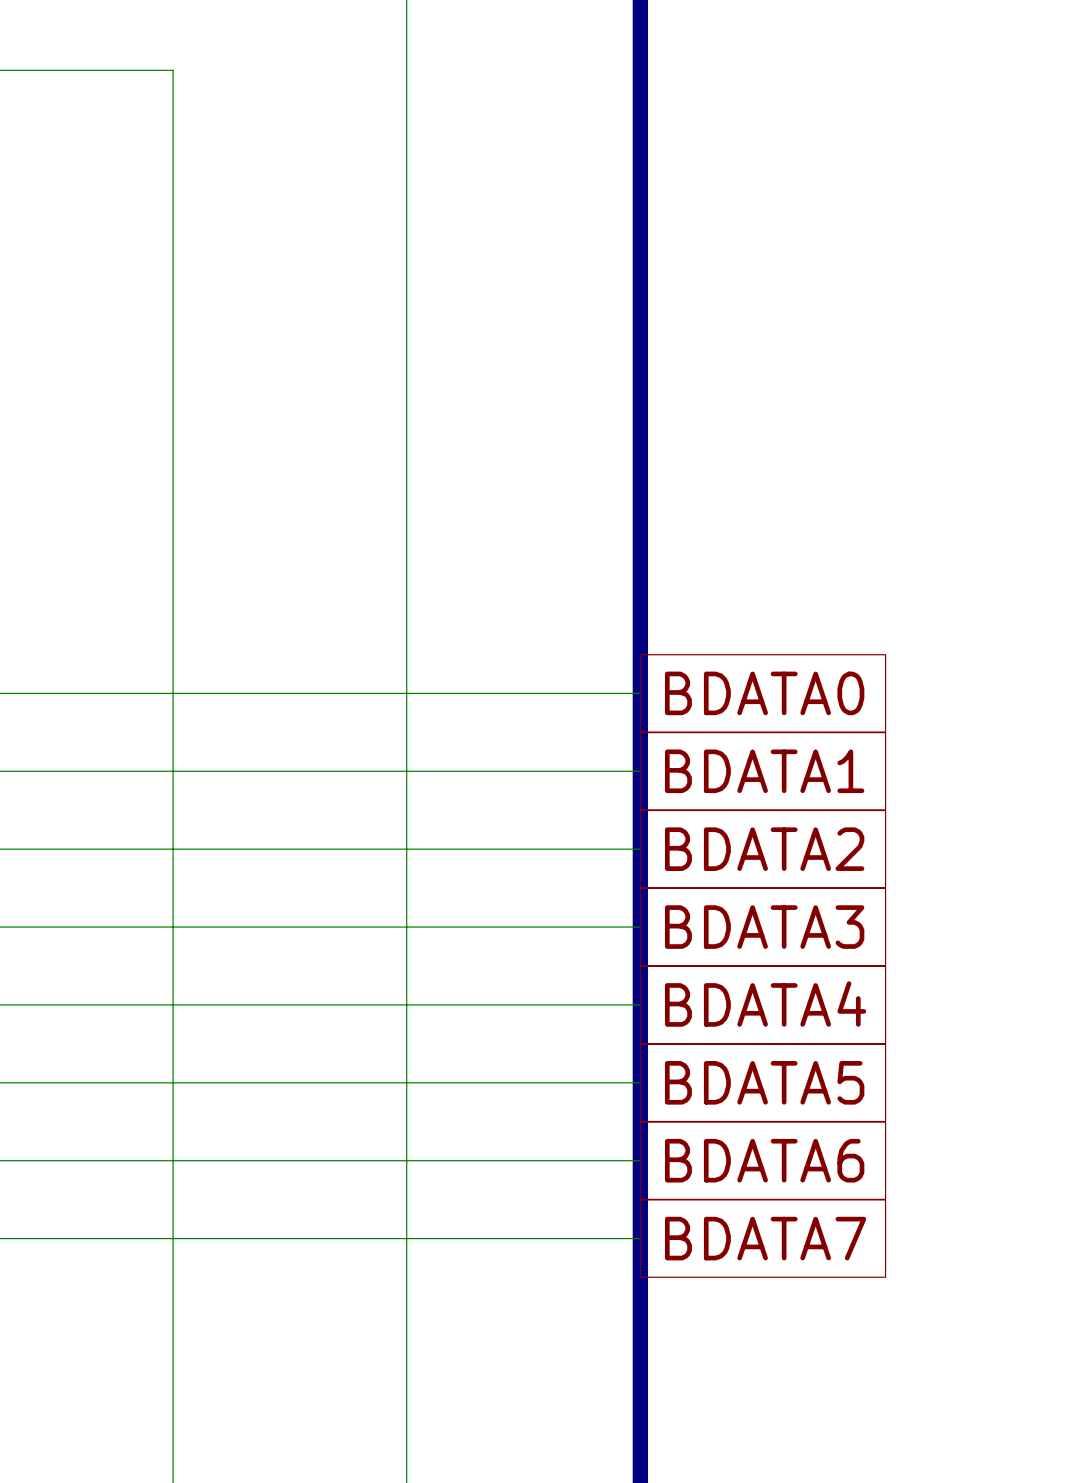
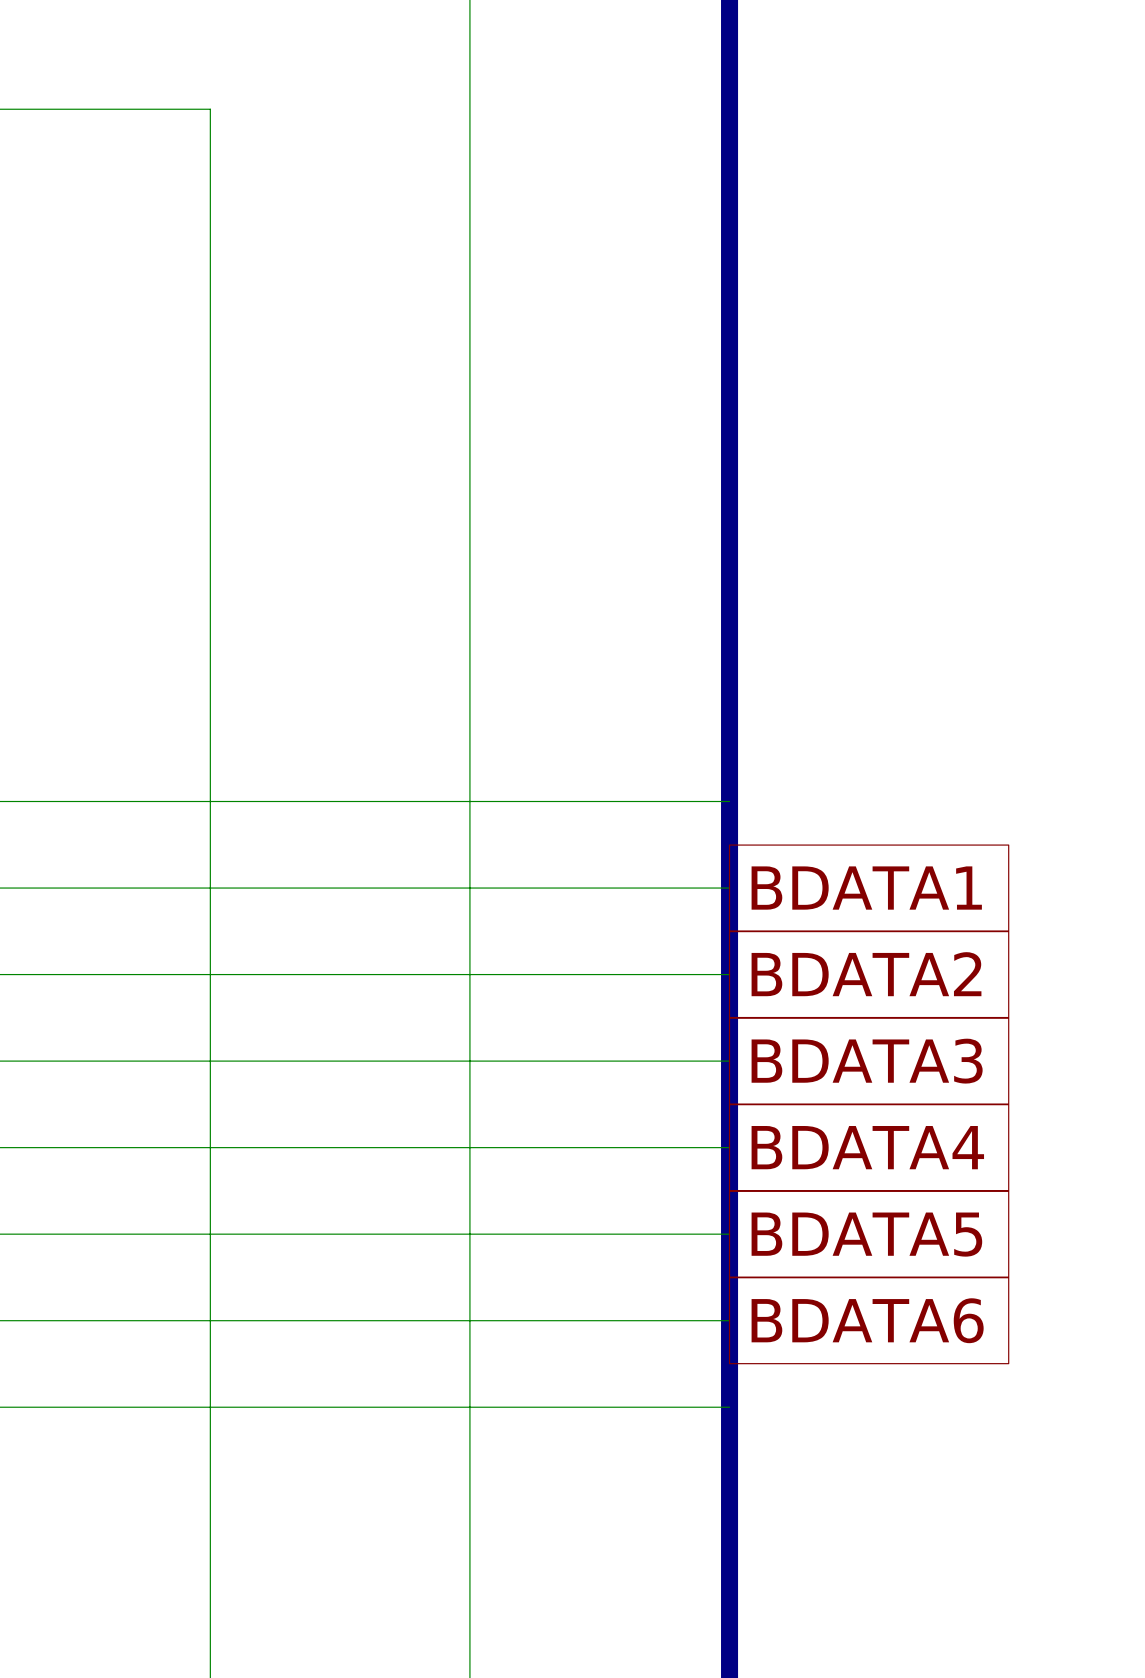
global label: BDATA0 (764, 693) -> none
global label: BDATA7 (765, 1238) -> none

